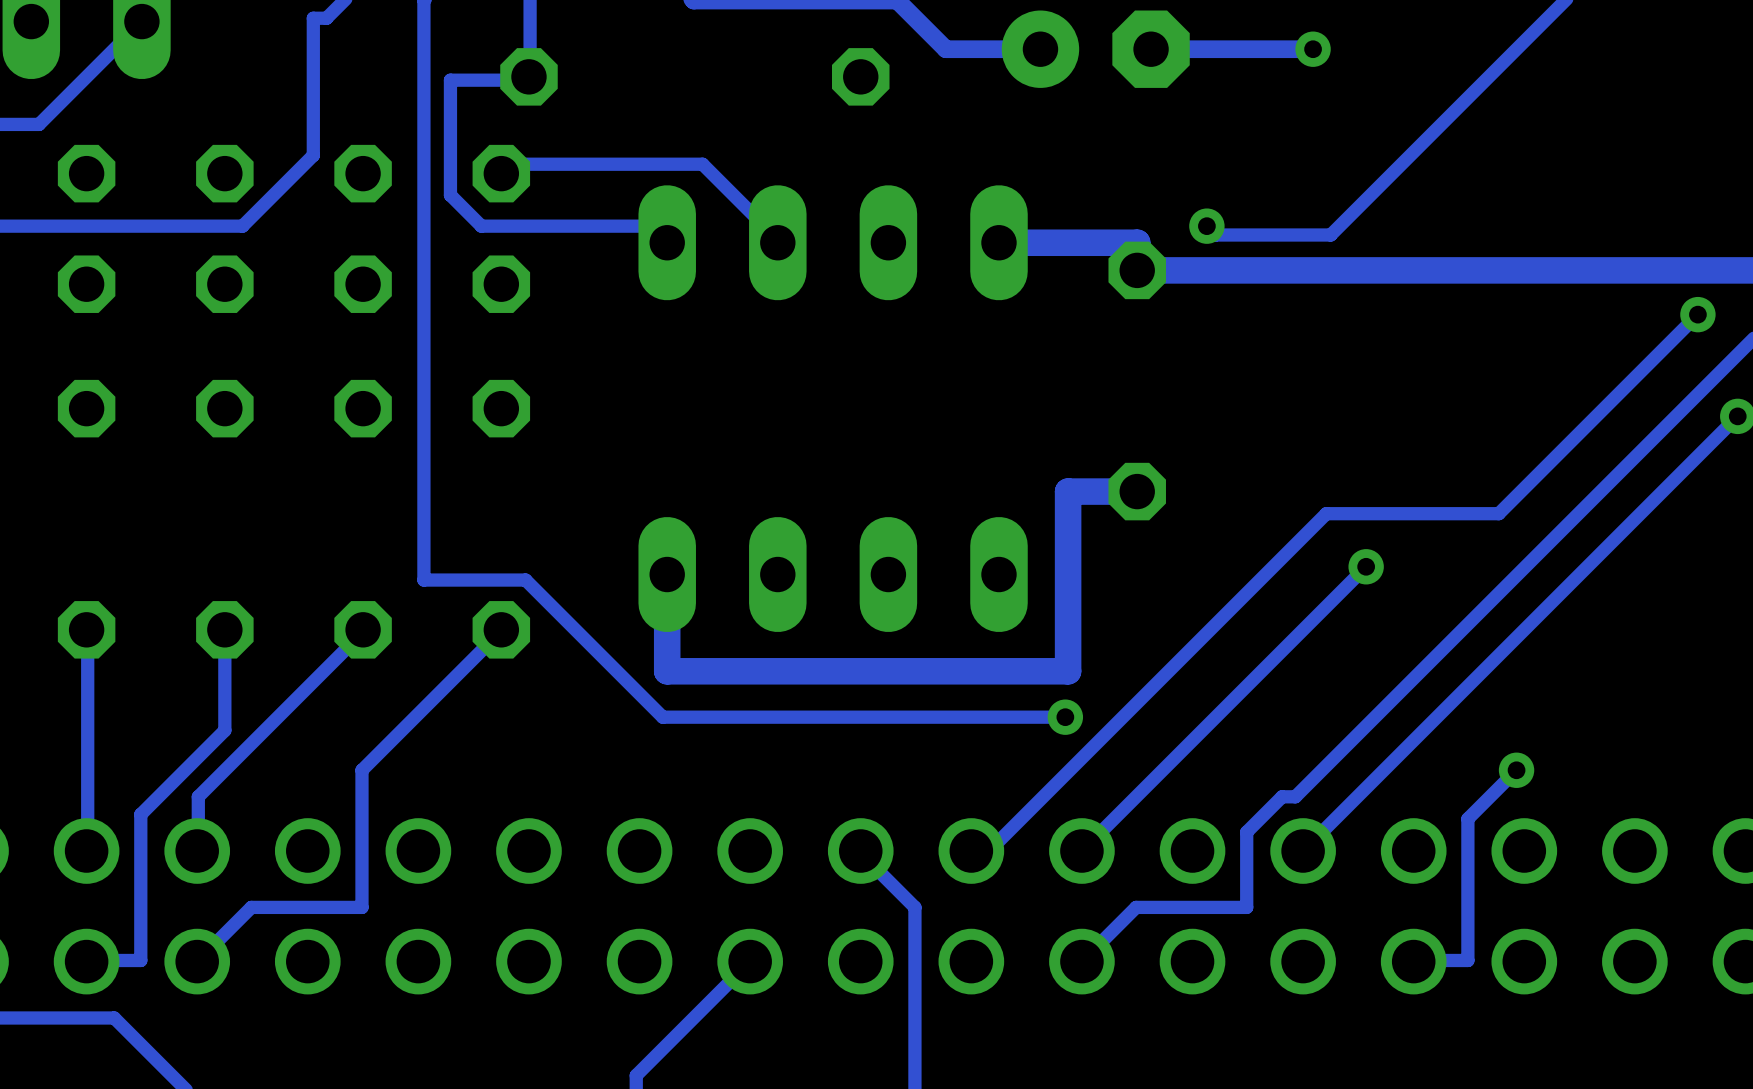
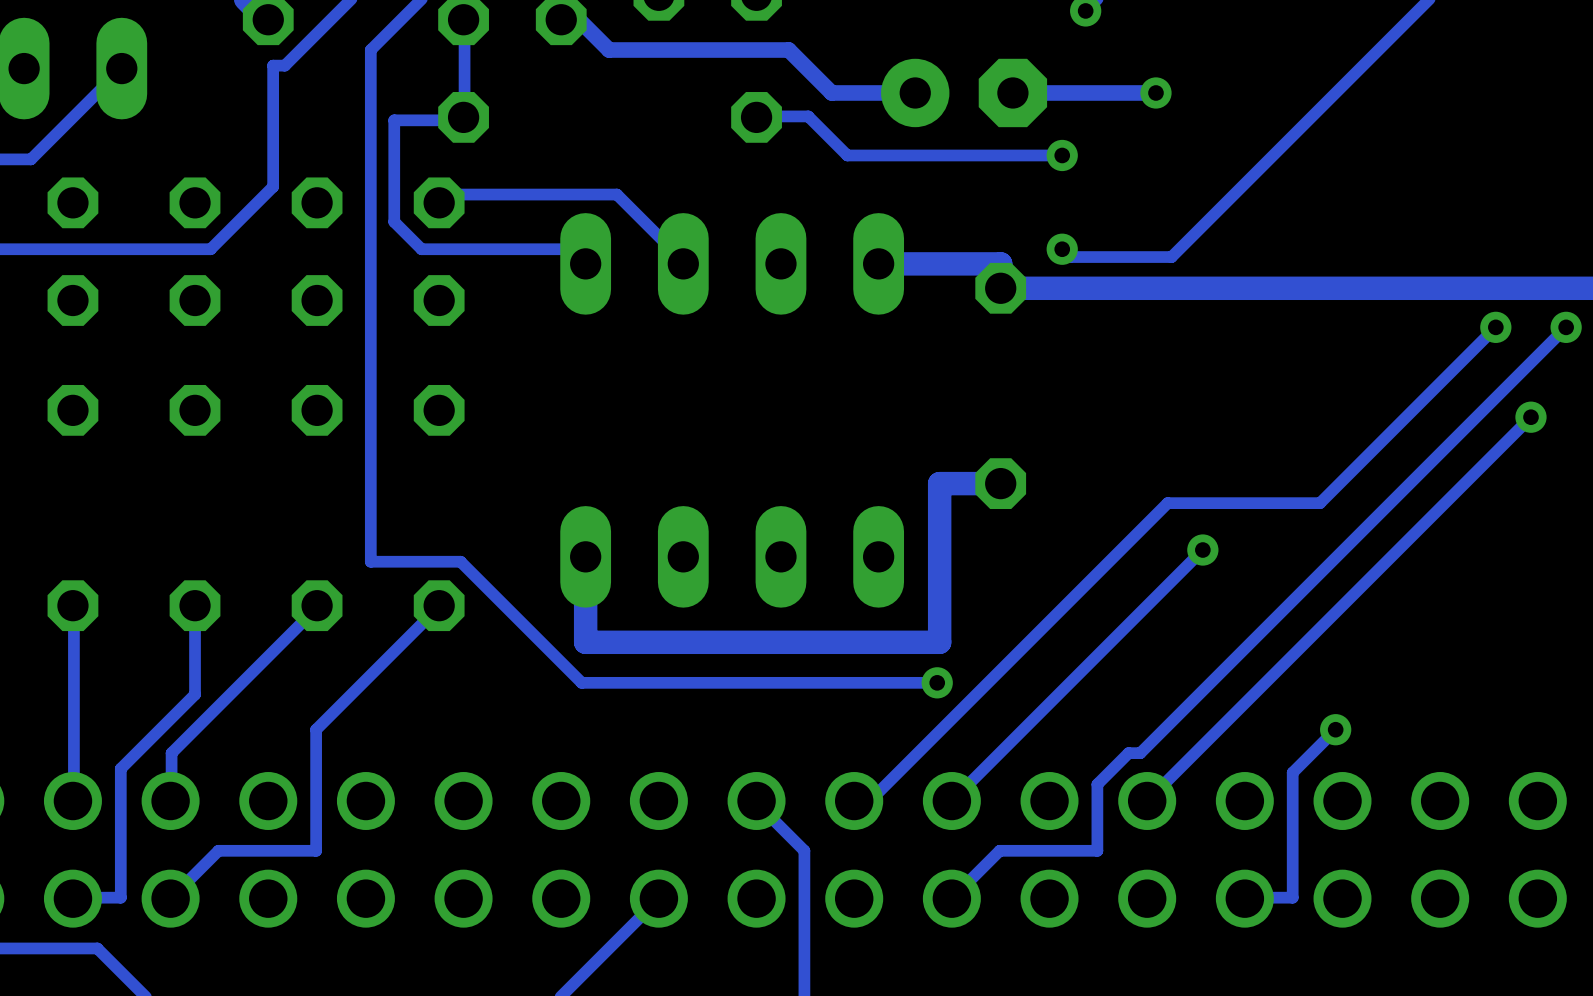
track: none -> (756, 117) (808, 116) (847, 155) (1062, 155)
via: none -> (1062, 155)

